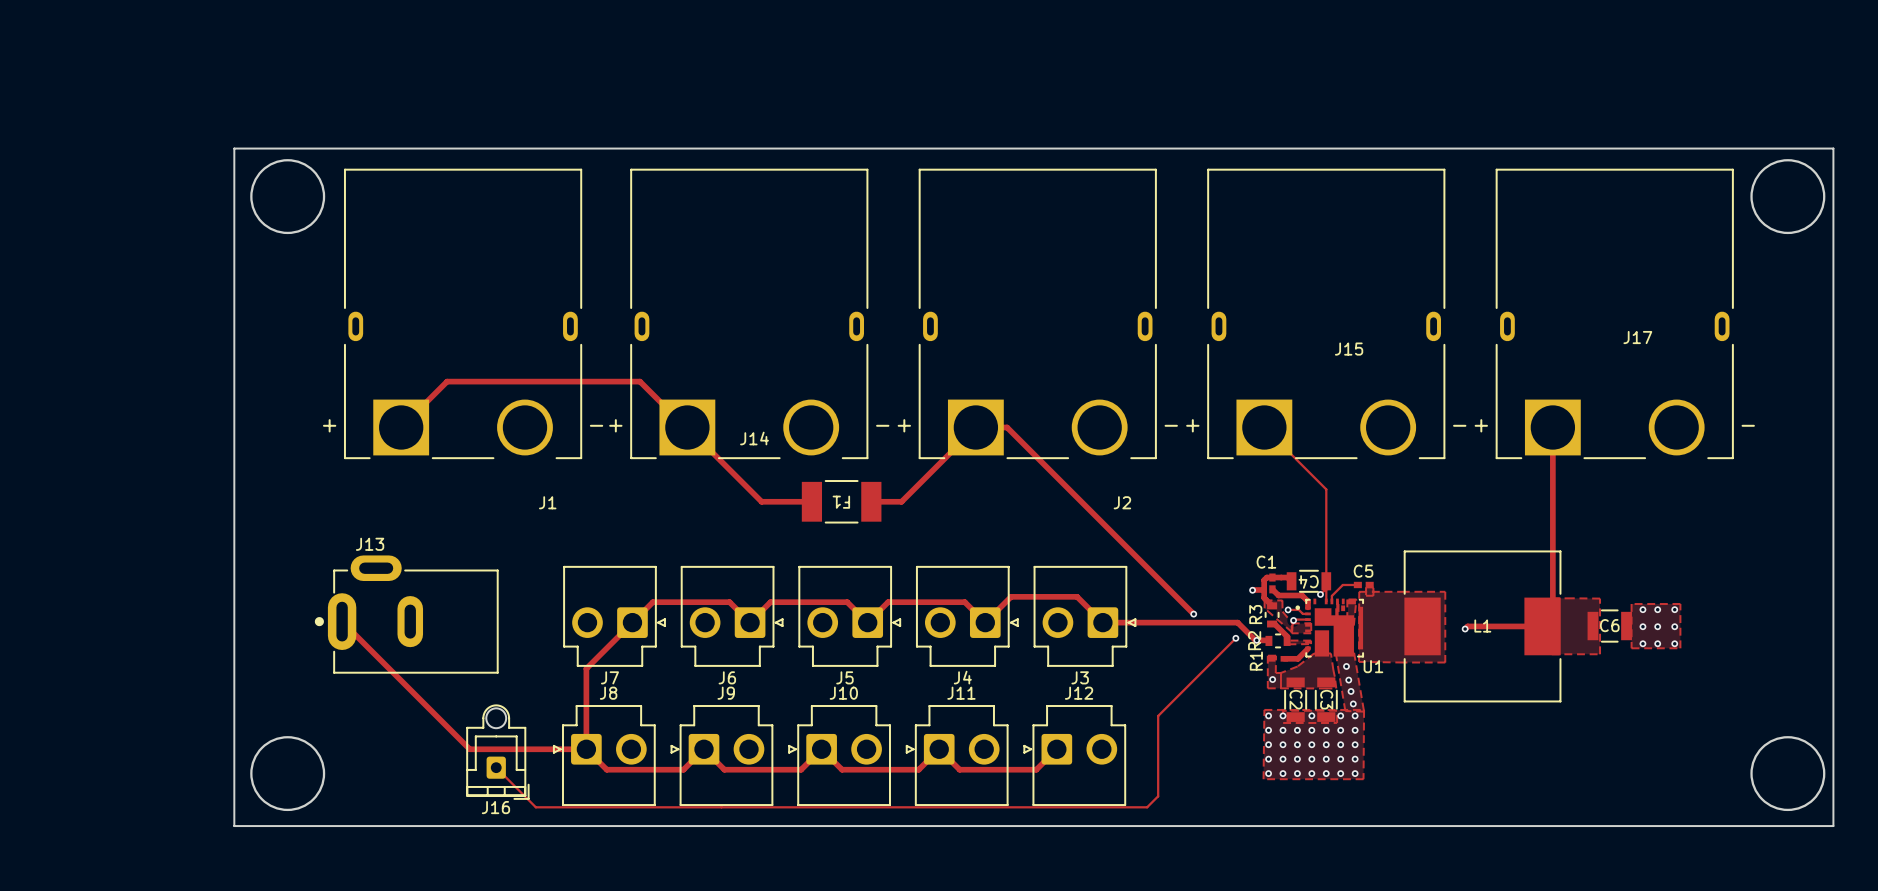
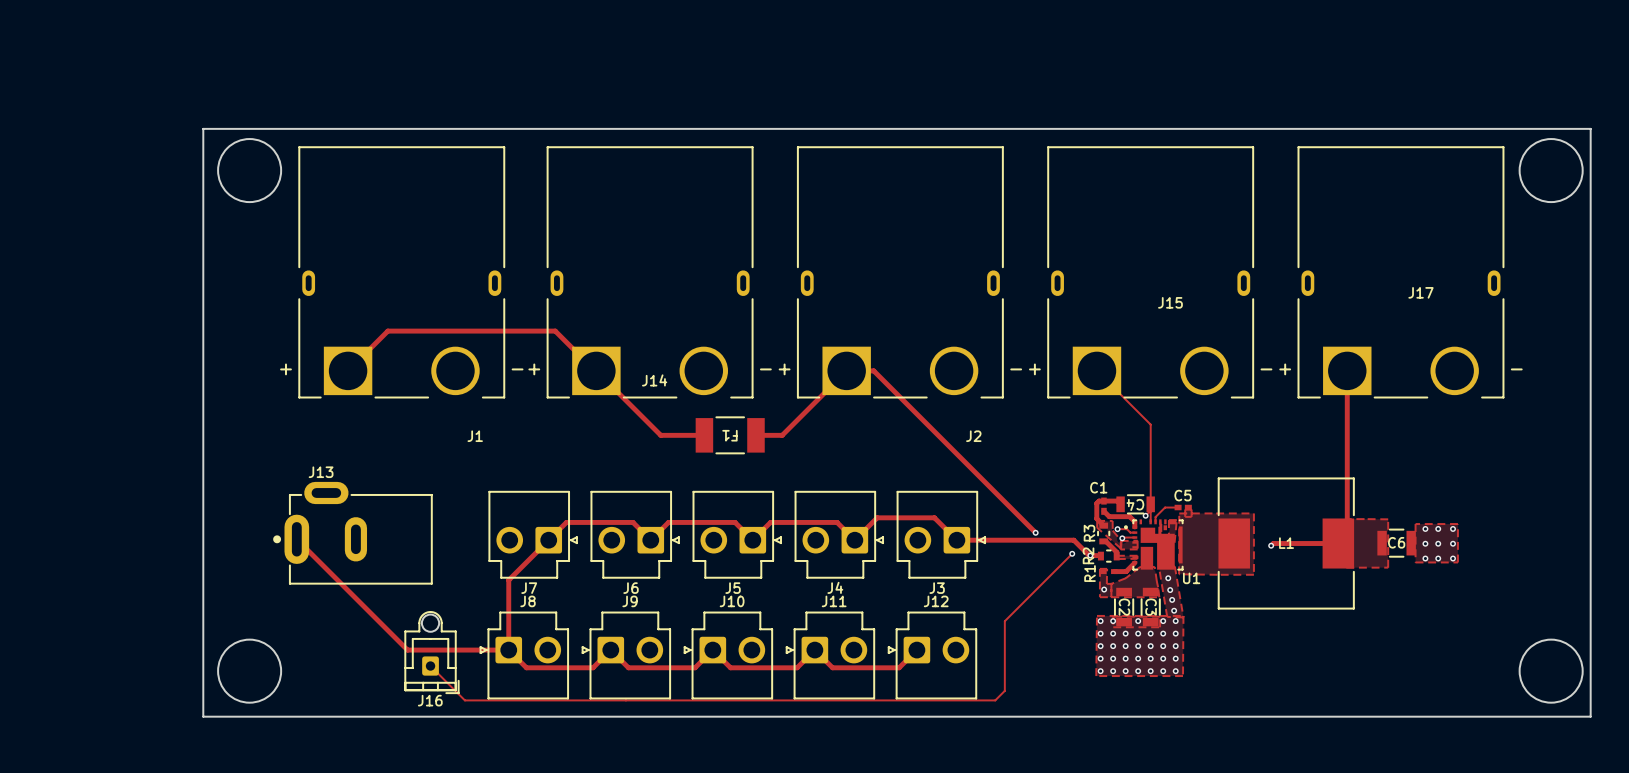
track: (1264, 589) (1252, 590) -> none
via: (1252, 590) -> none

